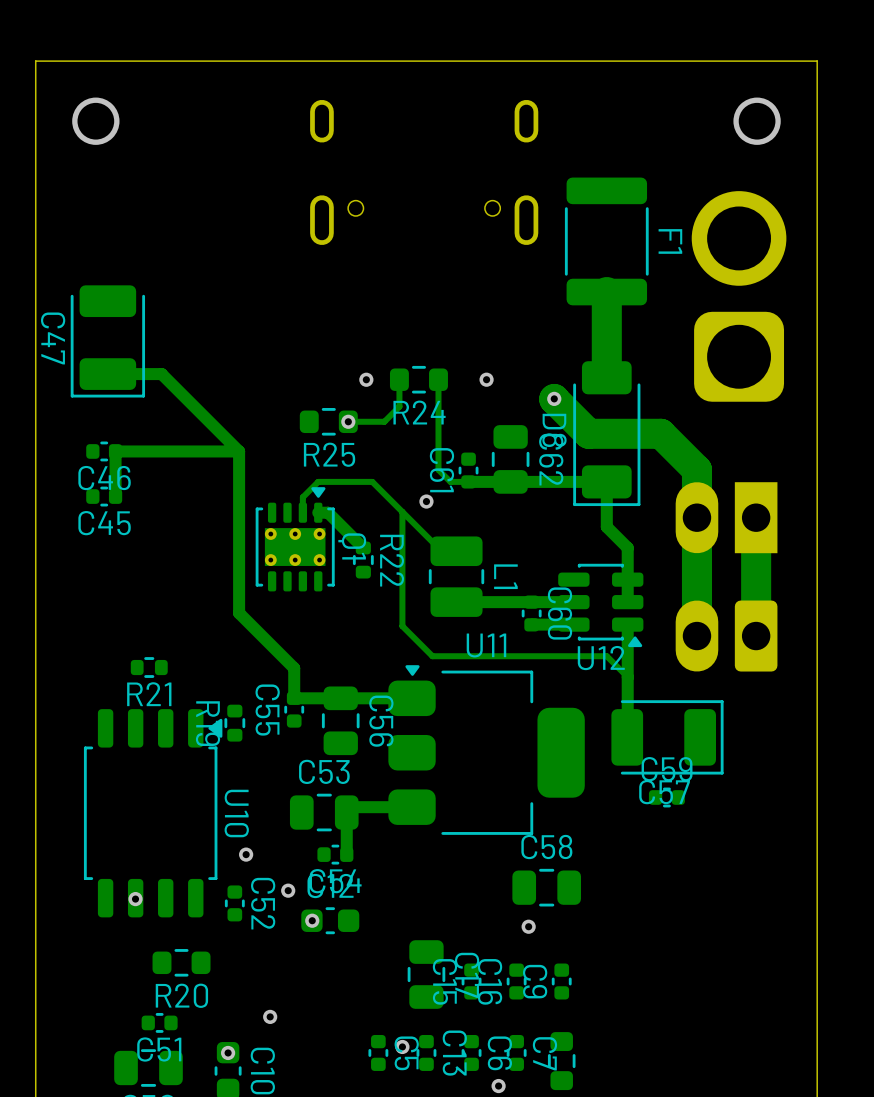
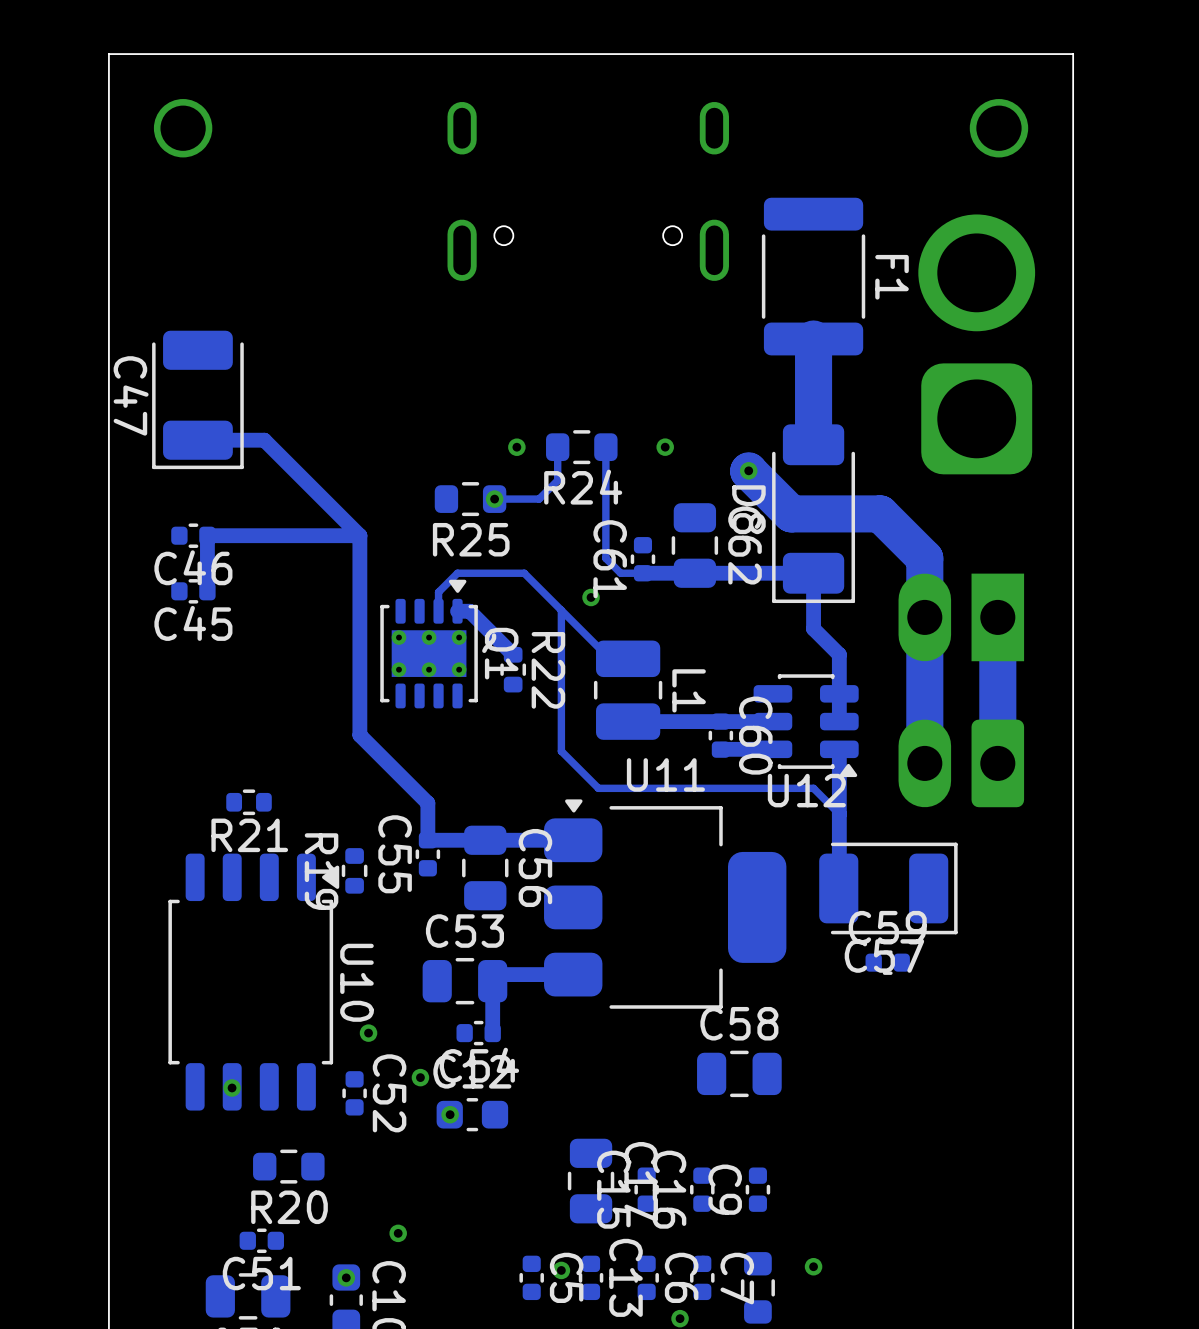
via: (528, 926) -> none
via: none -> (813, 1266)

